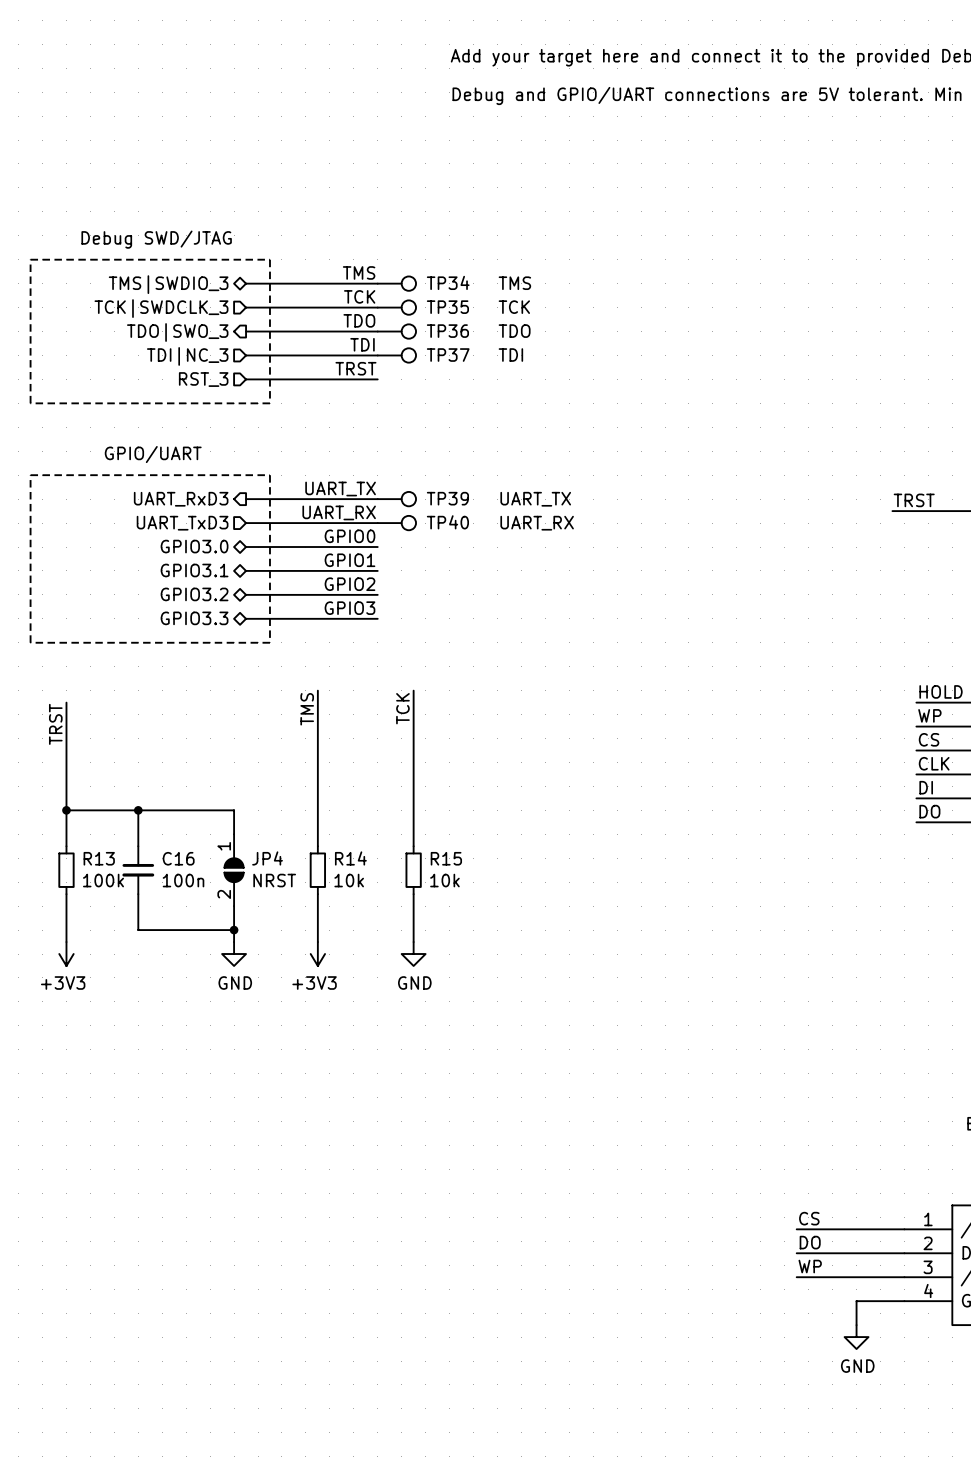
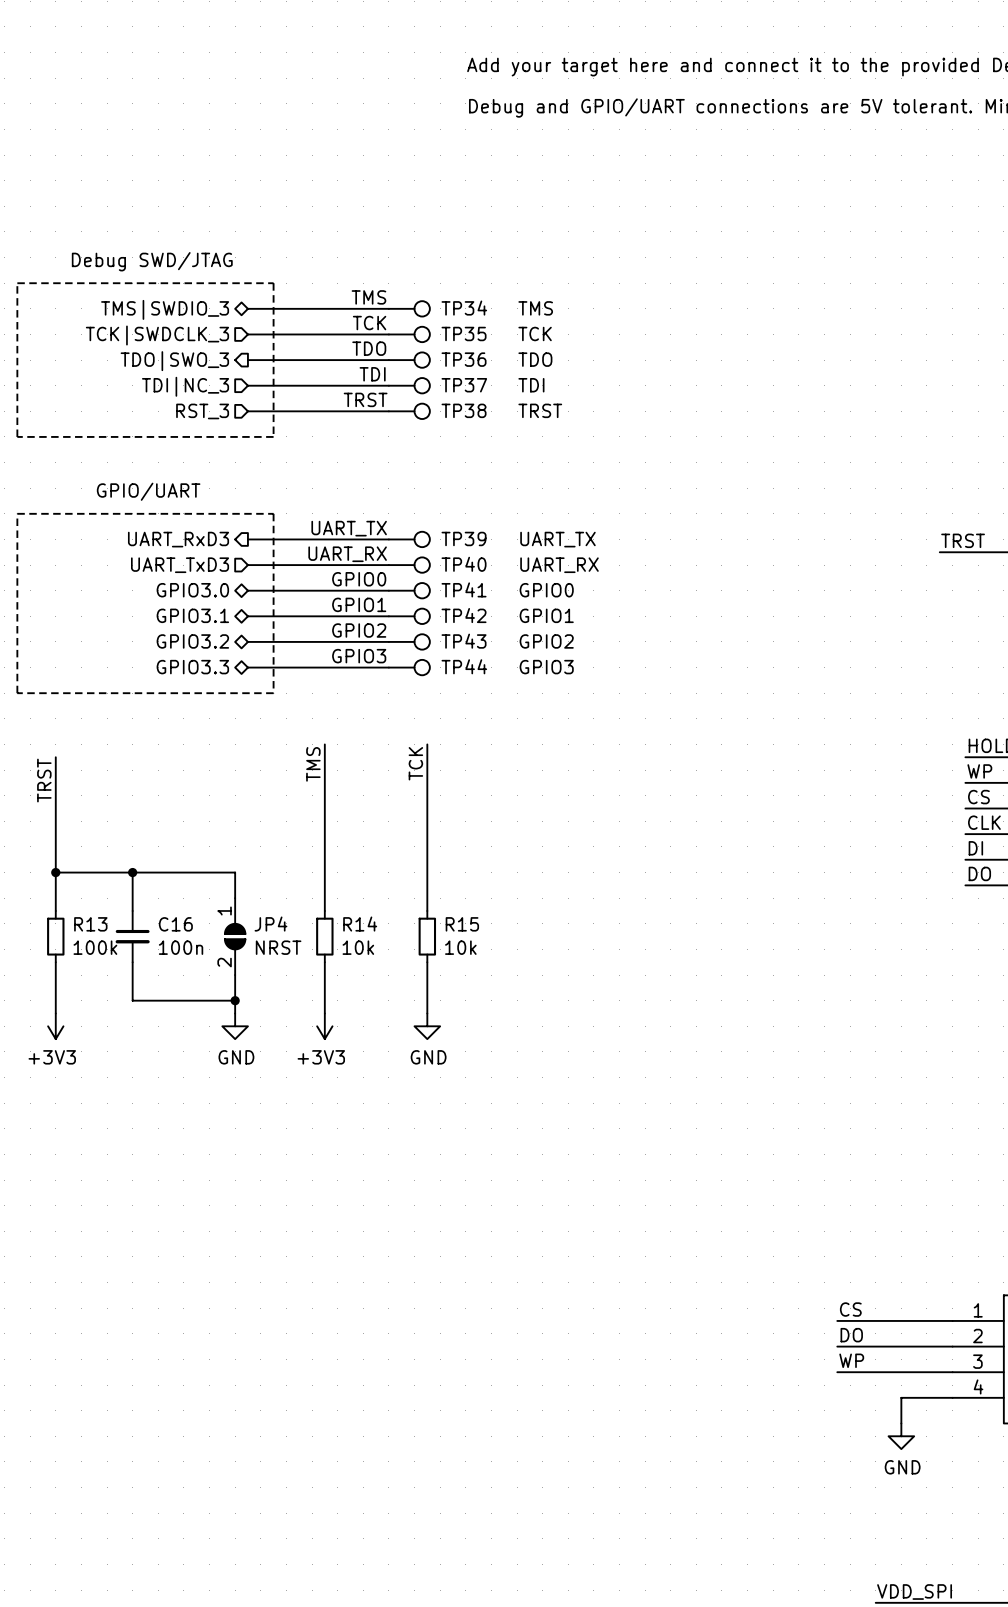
TP38: none -> TRST (409, 411)
TP41: none -> GPIO0 (409, 590)
TP42: none -> GPIO1 (409, 616)
TP43: none -> GPIO2 (409, 641)
TP44: none -> GPIO3 (409, 667)

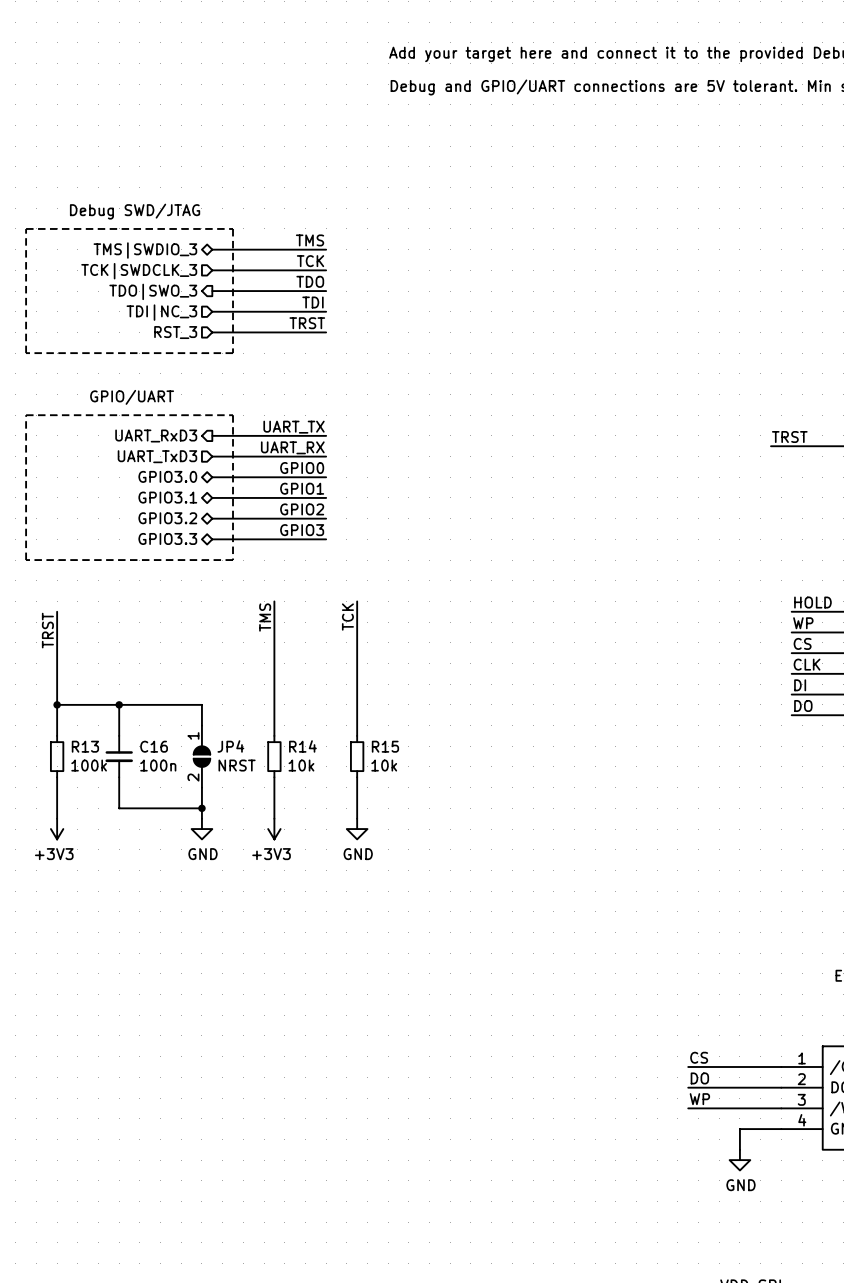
TP34: TMS (409, 308) -> none
TP35: TCK (409, 334) -> none
TP36: TDO (409, 360) -> none
TP37: TDI (409, 385) -> none
TP38: TRST (409, 411) -> none
TP39: UART_TX (409, 539) -> none
TP40: UART_RX (409, 565) -> none
TP41: GPIO0 (409, 590) -> none
TP42: GPIO1 (409, 616) -> none
TP43: GPIO2 (409, 641) -> none
TP44: GPIO3 (409, 667) -> none

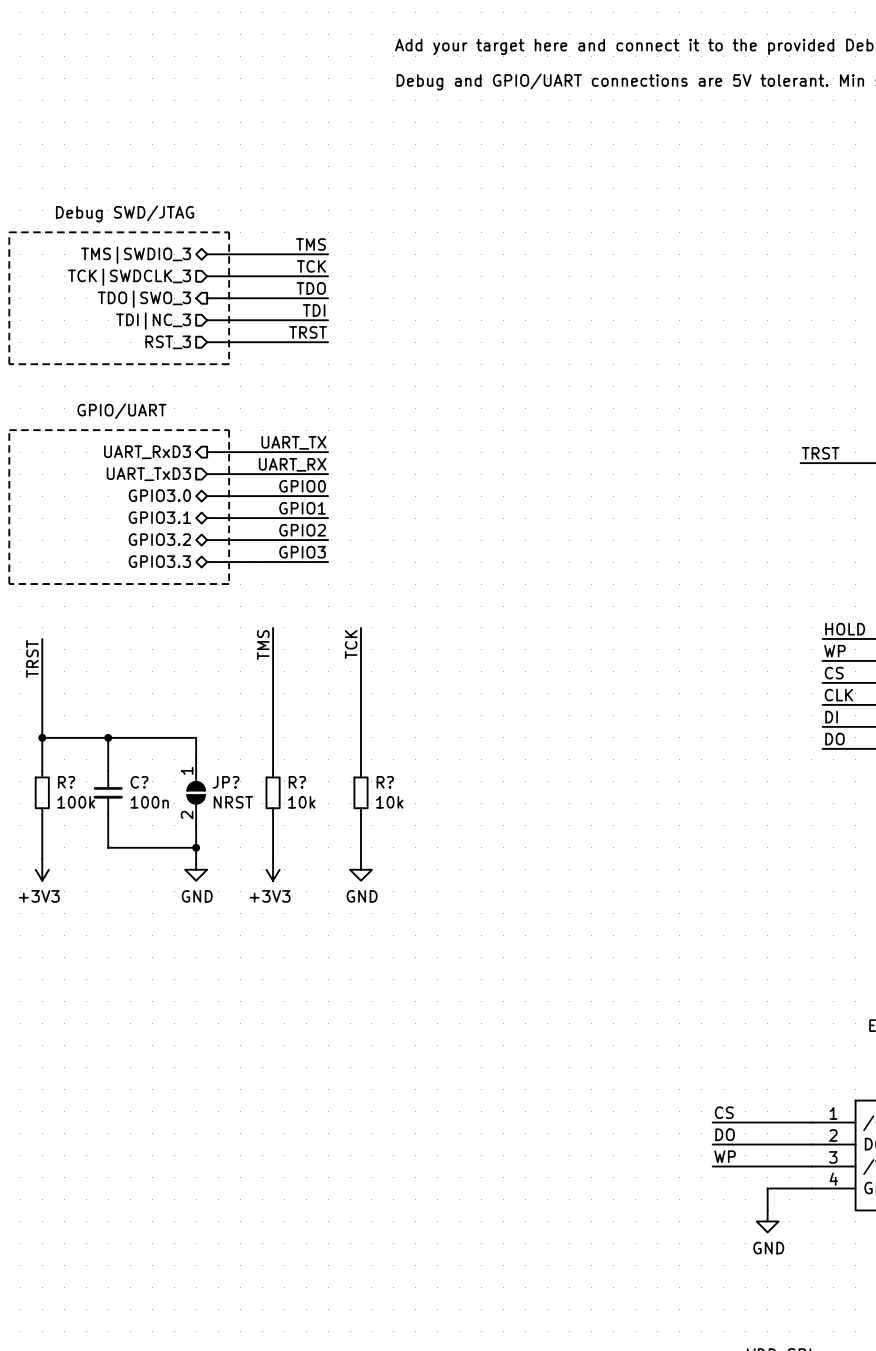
R13 name: R13 (85, 746) -> R? (66, 782)
C16 name: C16 (154, 746) -> C? (139, 782)
JP4 name: JP4 (230, 746) -> JP? (226, 782)
R14 name: R14 (302, 746) -> R? (297, 782)
R15 name: R15 (385, 746) -> R? (385, 782)

